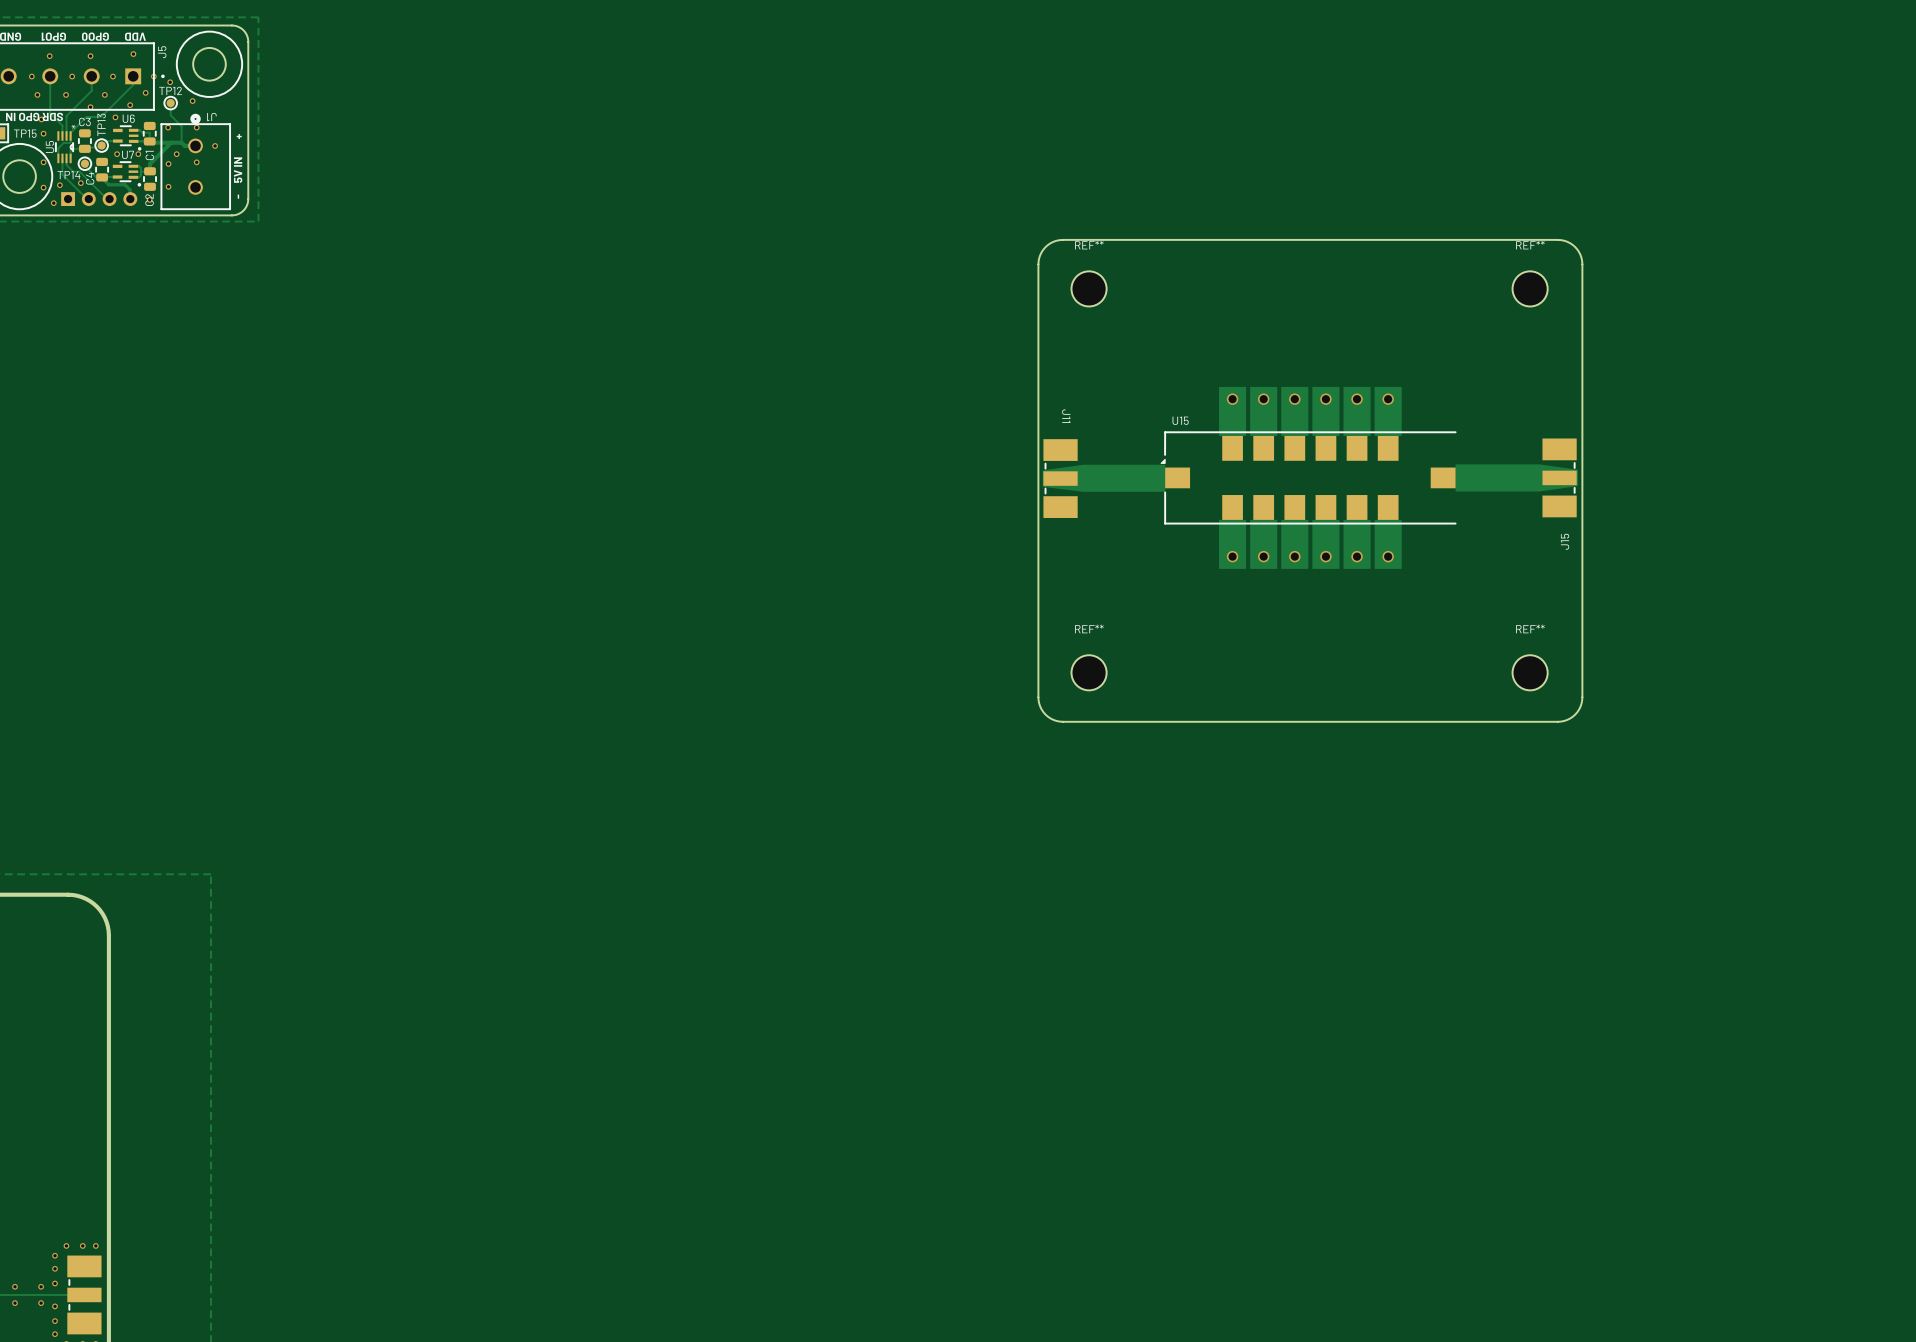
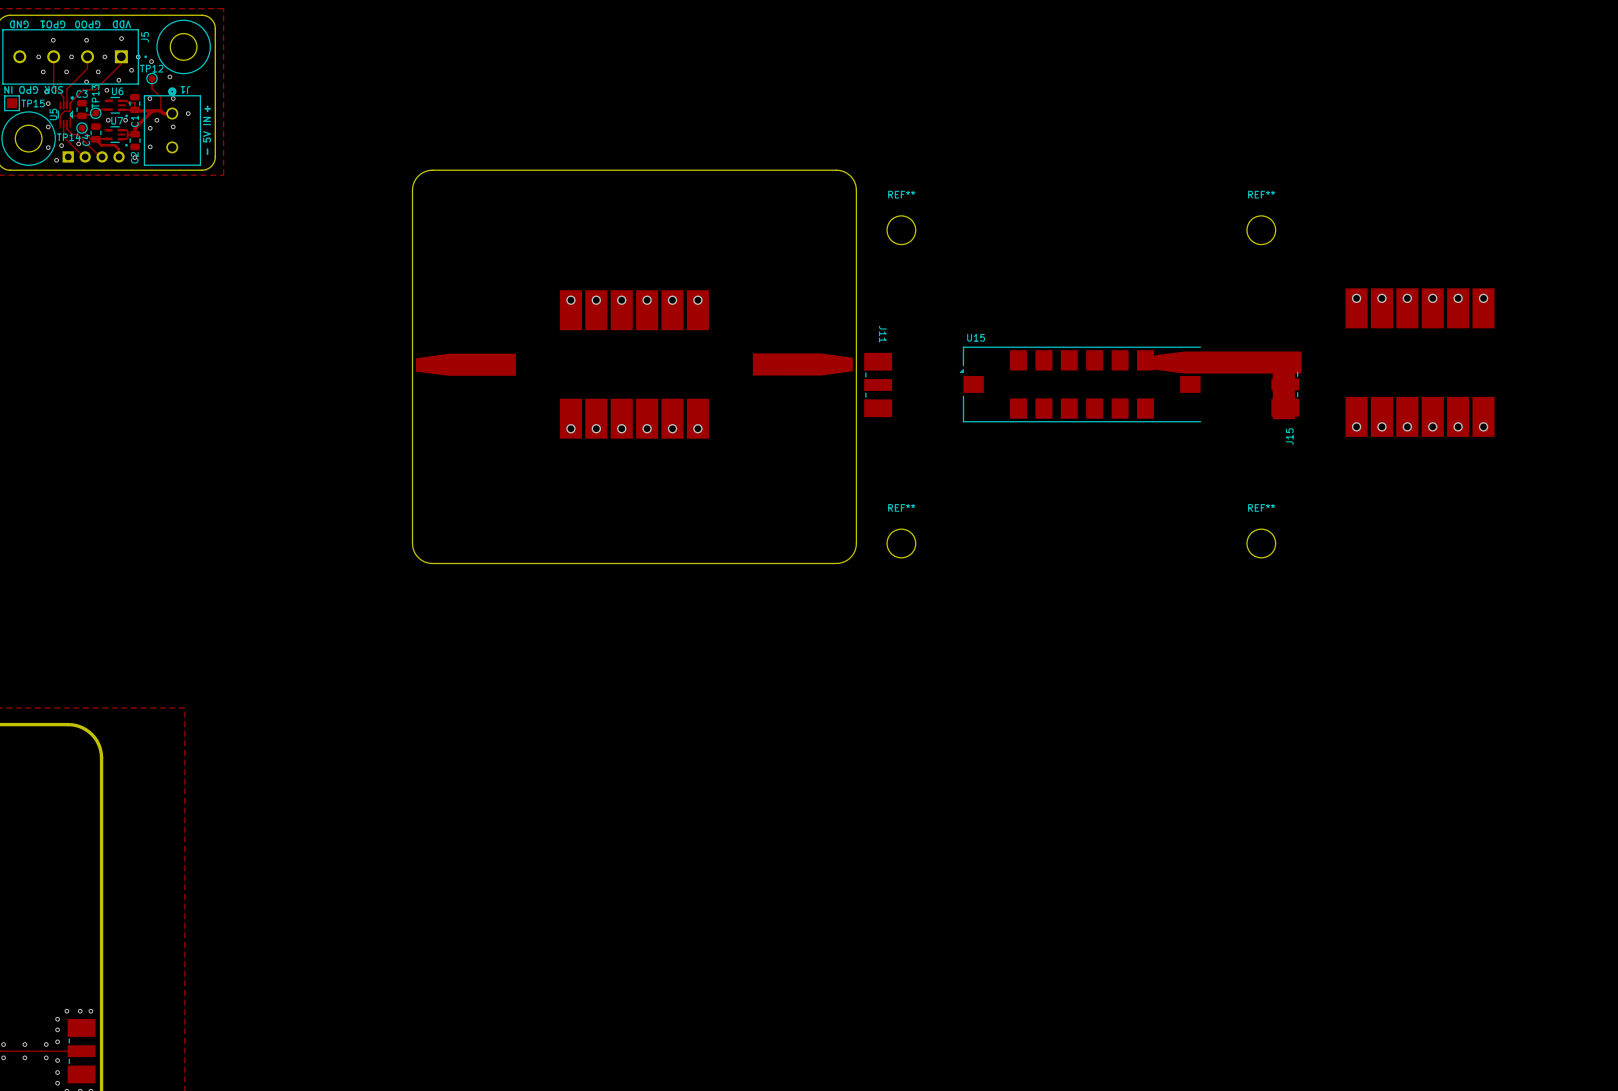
board edge: none -> (432, 170) (836, 170) (844, 171) (850, 176) (854, 182) (856, 190) (856, 543) (854, 551) (850, 557) (844, 561) (836, 563) (432, 563) (424, 561) (418, 557) (414, 551) (412, 543) (412, 190) (414, 182) (418, 176) (424, 171) (432, 170)
board edge: (1062, 239) (1557, 239) (1567, 241) (1575, 247) (1580, 255) (1582, 264) (1582, 697) (1580, 706) (1575, 714) (1567, 719) (1557, 721) (1062, 721) (1053, 719) (1045, 714) (1040, 706) (1038, 697) (1038, 264) (1040, 255) (1045, 247) (1053, 241) (1062, 239) -> none
drawing: none -> [1345, 288, 1495, 329]
drawing: none -> [559, 290, 709, 331]
via: none -> (1356, 298)
via: none -> (1381, 298)
via: none -> (1407, 298)
via: none -> (1432, 298)
via: none -> (1458, 298)
via: none -> (1483, 298)
via: none -> (570, 300)
via: none -> (596, 300)
via: none -> (621, 300)
via: none -> (647, 300)
via: none -> (672, 300)
via: none -> (697, 300)
drawing: [1219, 386, 1402, 436] -> none
via: (1232, 399) -> none
via: (1263, 399) -> none
via: (1294, 399) -> none
via: (1325, 399) -> none
via: (1357, 399) -> none
via: (1388, 399) -> none
drawing: none -> [1151, 351, 1302, 420]
drawing: none -> [752, 353, 853, 376]
drawing: none -> [415, 353, 516, 376]
drawing: [1042, 464, 1166, 492] -> none
drawing: [1455, 464, 1579, 492] -> none
drawing: none -> [1345, 396, 1495, 437]
drawing: none -> [559, 398, 709, 439]
drawing: [1219, 519, 1402, 569] -> none
via: none -> (1356, 426)
via: none -> (1381, 426)
via: none -> (1407, 426)
via: none -> (1432, 426)
via: none -> (1458, 426)
via: none -> (1483, 426)
via: none -> (570, 428)
via: none -> (596, 428)
via: none -> (621, 428)
via: none -> (647, 428)
via: none -> (672, 428)
via: none -> (697, 428)
via: (1232, 556) -> none
via: (1263, 556) -> none
via: (1294, 556) -> none
via: (1325, 556) -> none
via: (1357, 556) -> none
via: (1388, 556) -> none

